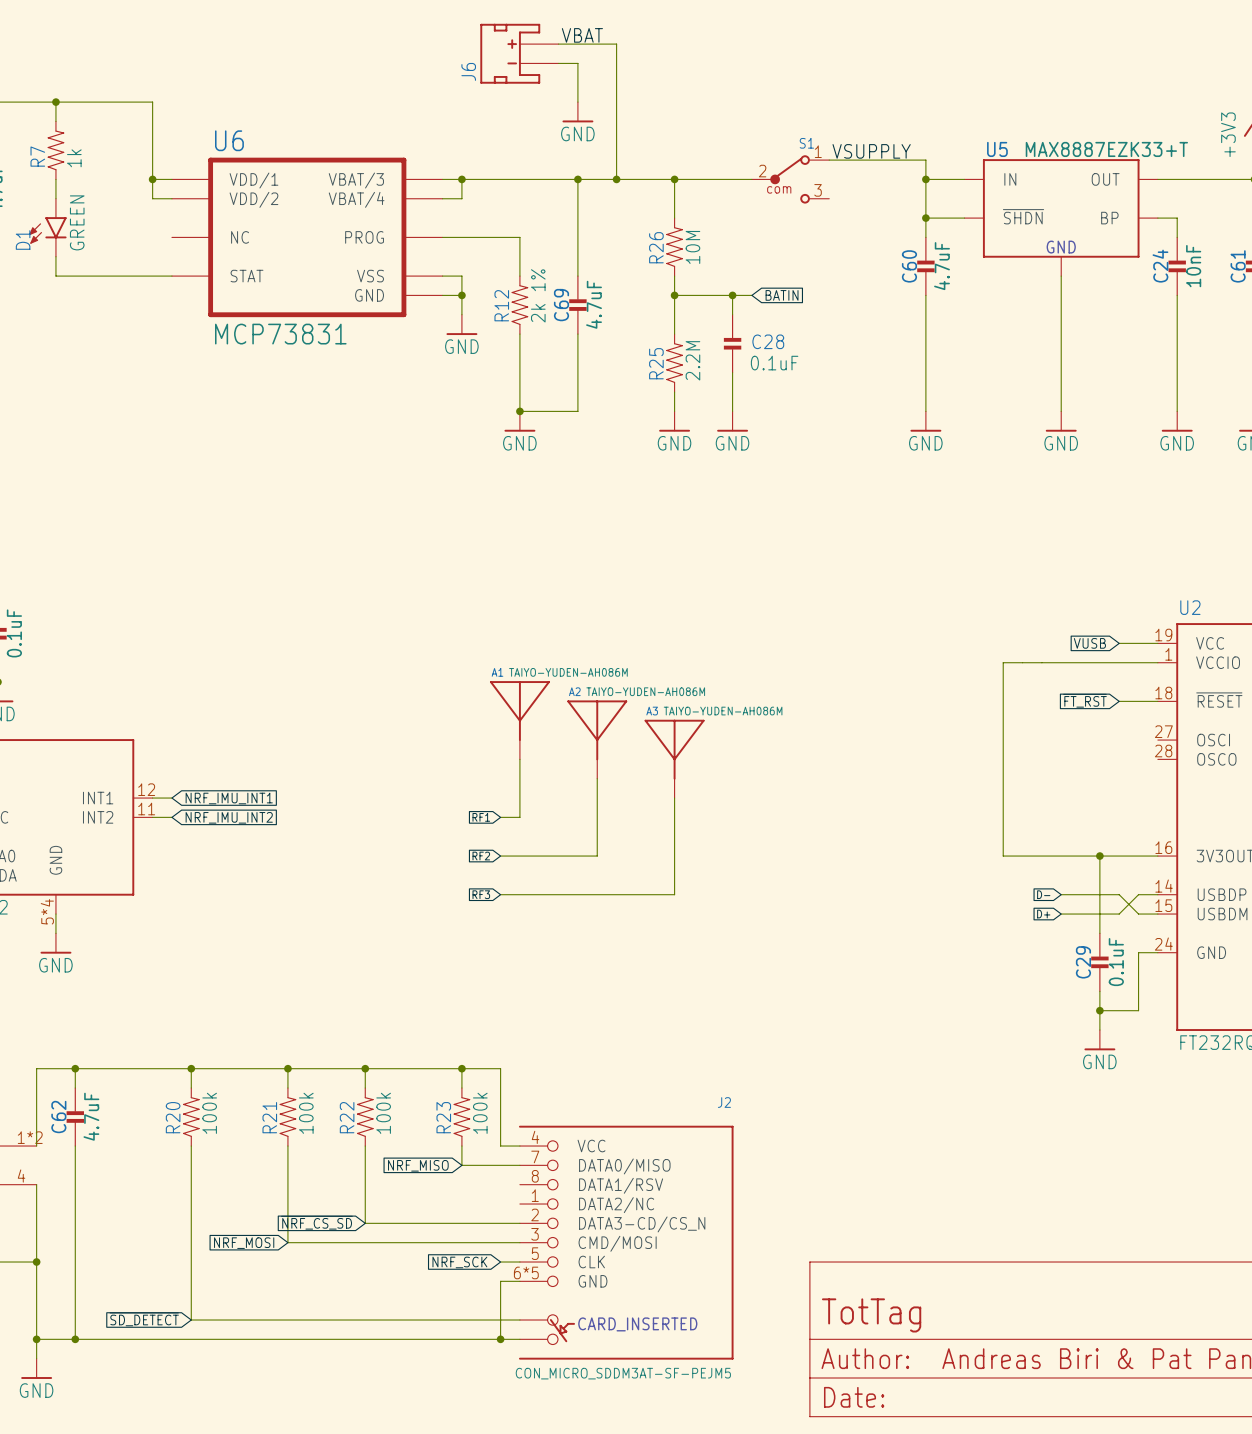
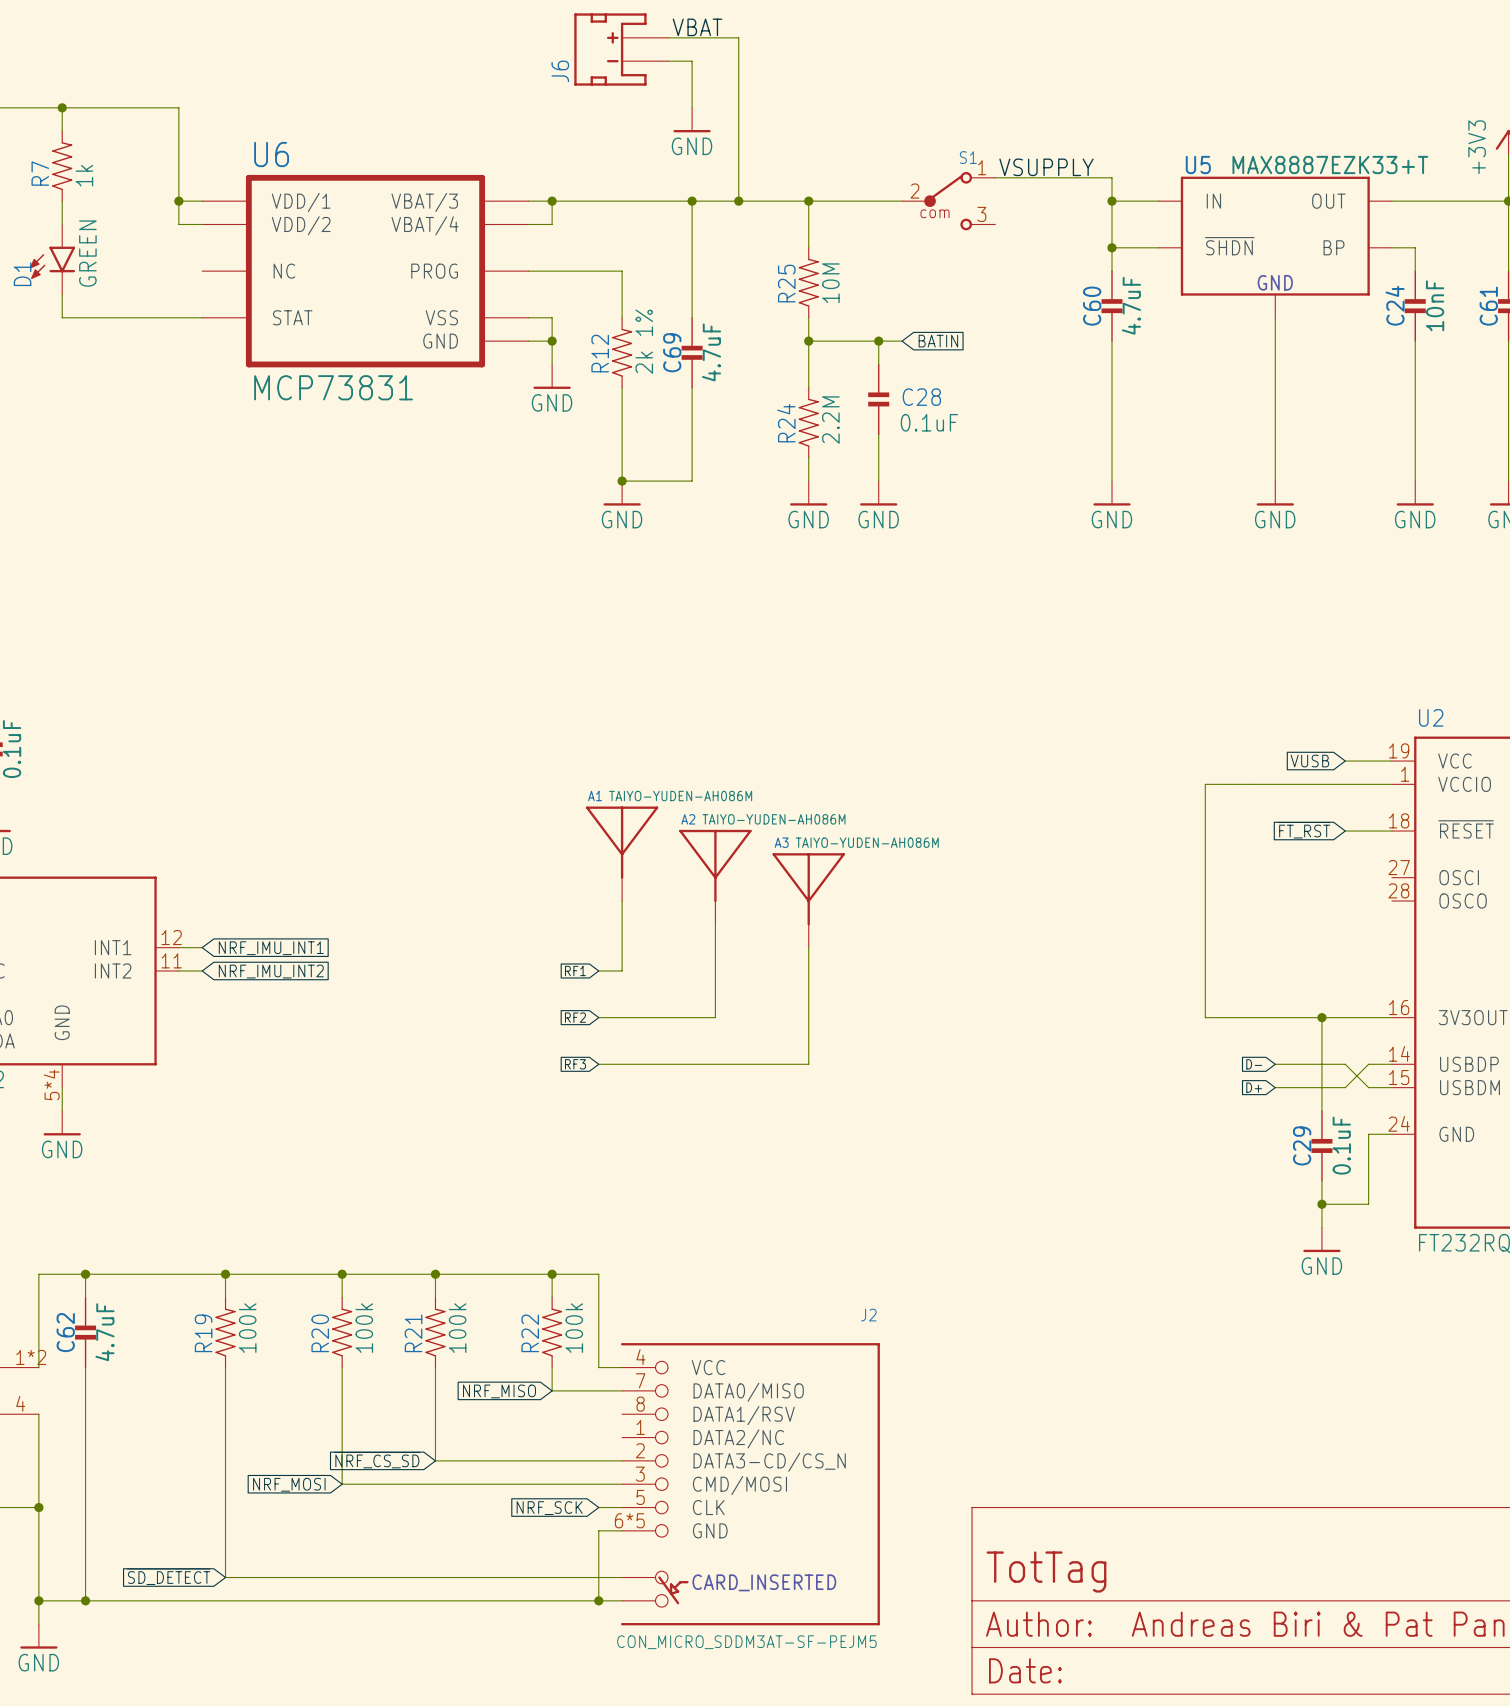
R26 name: R26 (656, 247) -> R25 (786, 283)
R25 name: R25 (656, 363) -> R24 (786, 423)
R20 name: R20 (173, 1117) -> R19 (203, 1333)
R21 name: R21 (269, 1117) -> R20 (320, 1333)
R22 name: R22 (347, 1117) -> R21 (413, 1333)
R23 name: R23 (443, 1117) -> R22 (530, 1333)

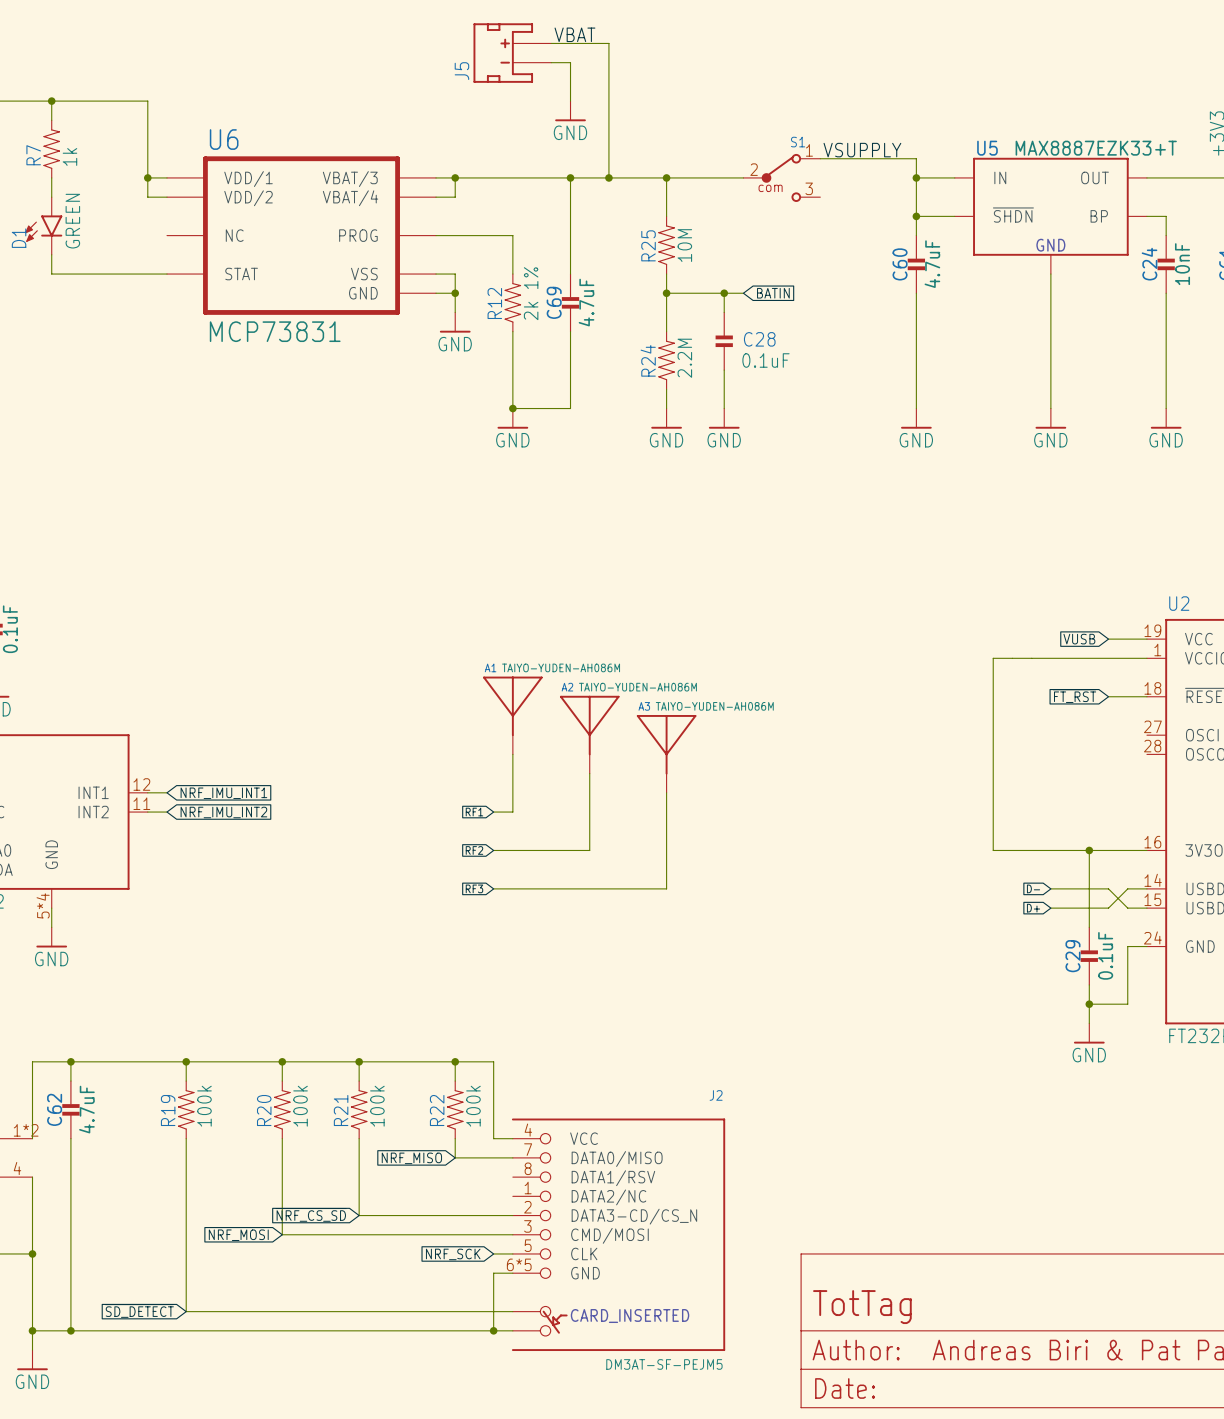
J6 name: J6 (560, 71) -> J5 (461, 71)
J2 value: CON_MICRO_SDDM3AT-SF-PEJM5 (746, 1642) -> DM3AT-SF-PEJM5 (664, 1364)

